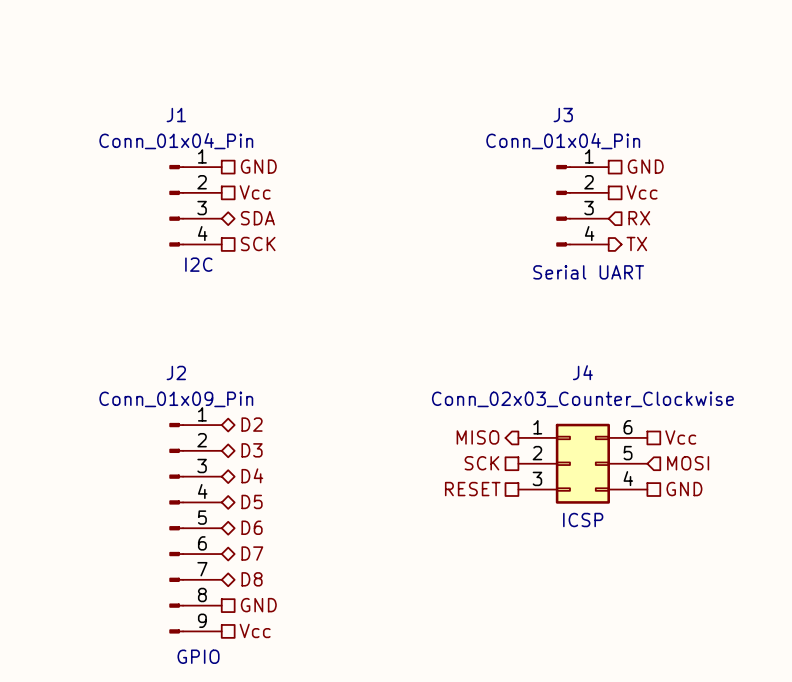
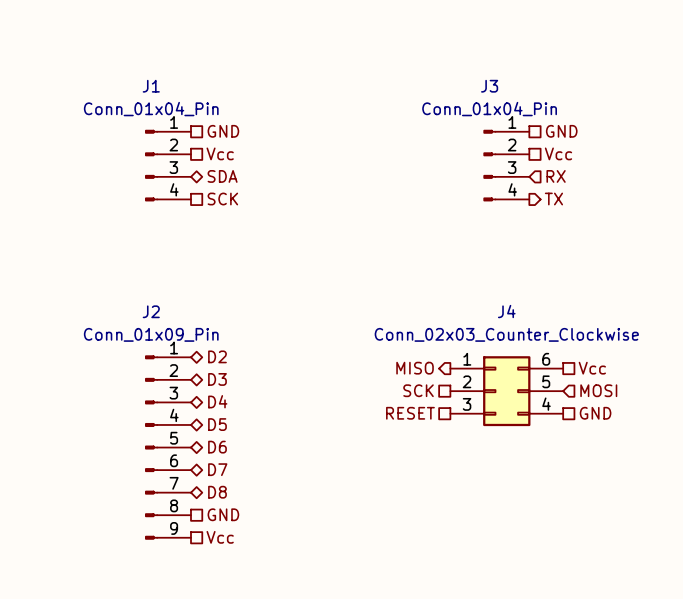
J1 text: I2C (198, 264) -> none
J3 text: Serial UART (588, 272) -> none
J4 text: ICSP (583, 520) -> none
J2 text: GPIO (198, 656) -> none

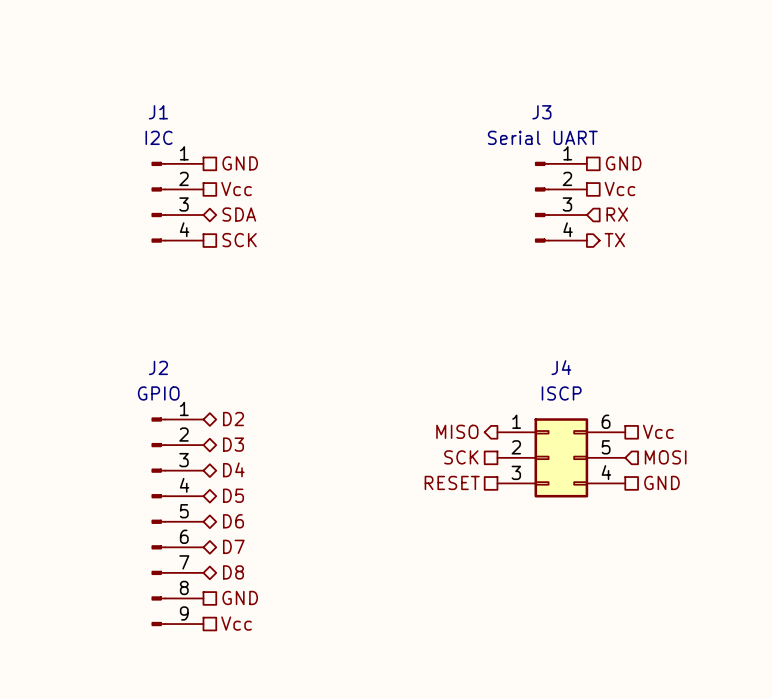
J1 value: Conn_01x04_Pin (151, 109) -> I2C (159, 137)
J3 value: Conn_01x04_Pin (489, 109) -> Serial UART (542, 137)
J2 value: Conn_01x09_Pin (151, 334) -> GPIO (158, 393)
J4 value: Conn_02x03_Counter_Clockwise (506, 334) -> ISCP (561, 393)

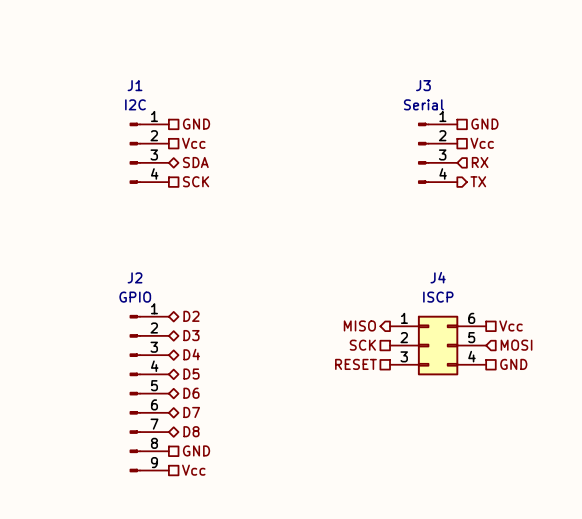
J3 value: Serial UART (542, 137) -> Serial (423, 104)

